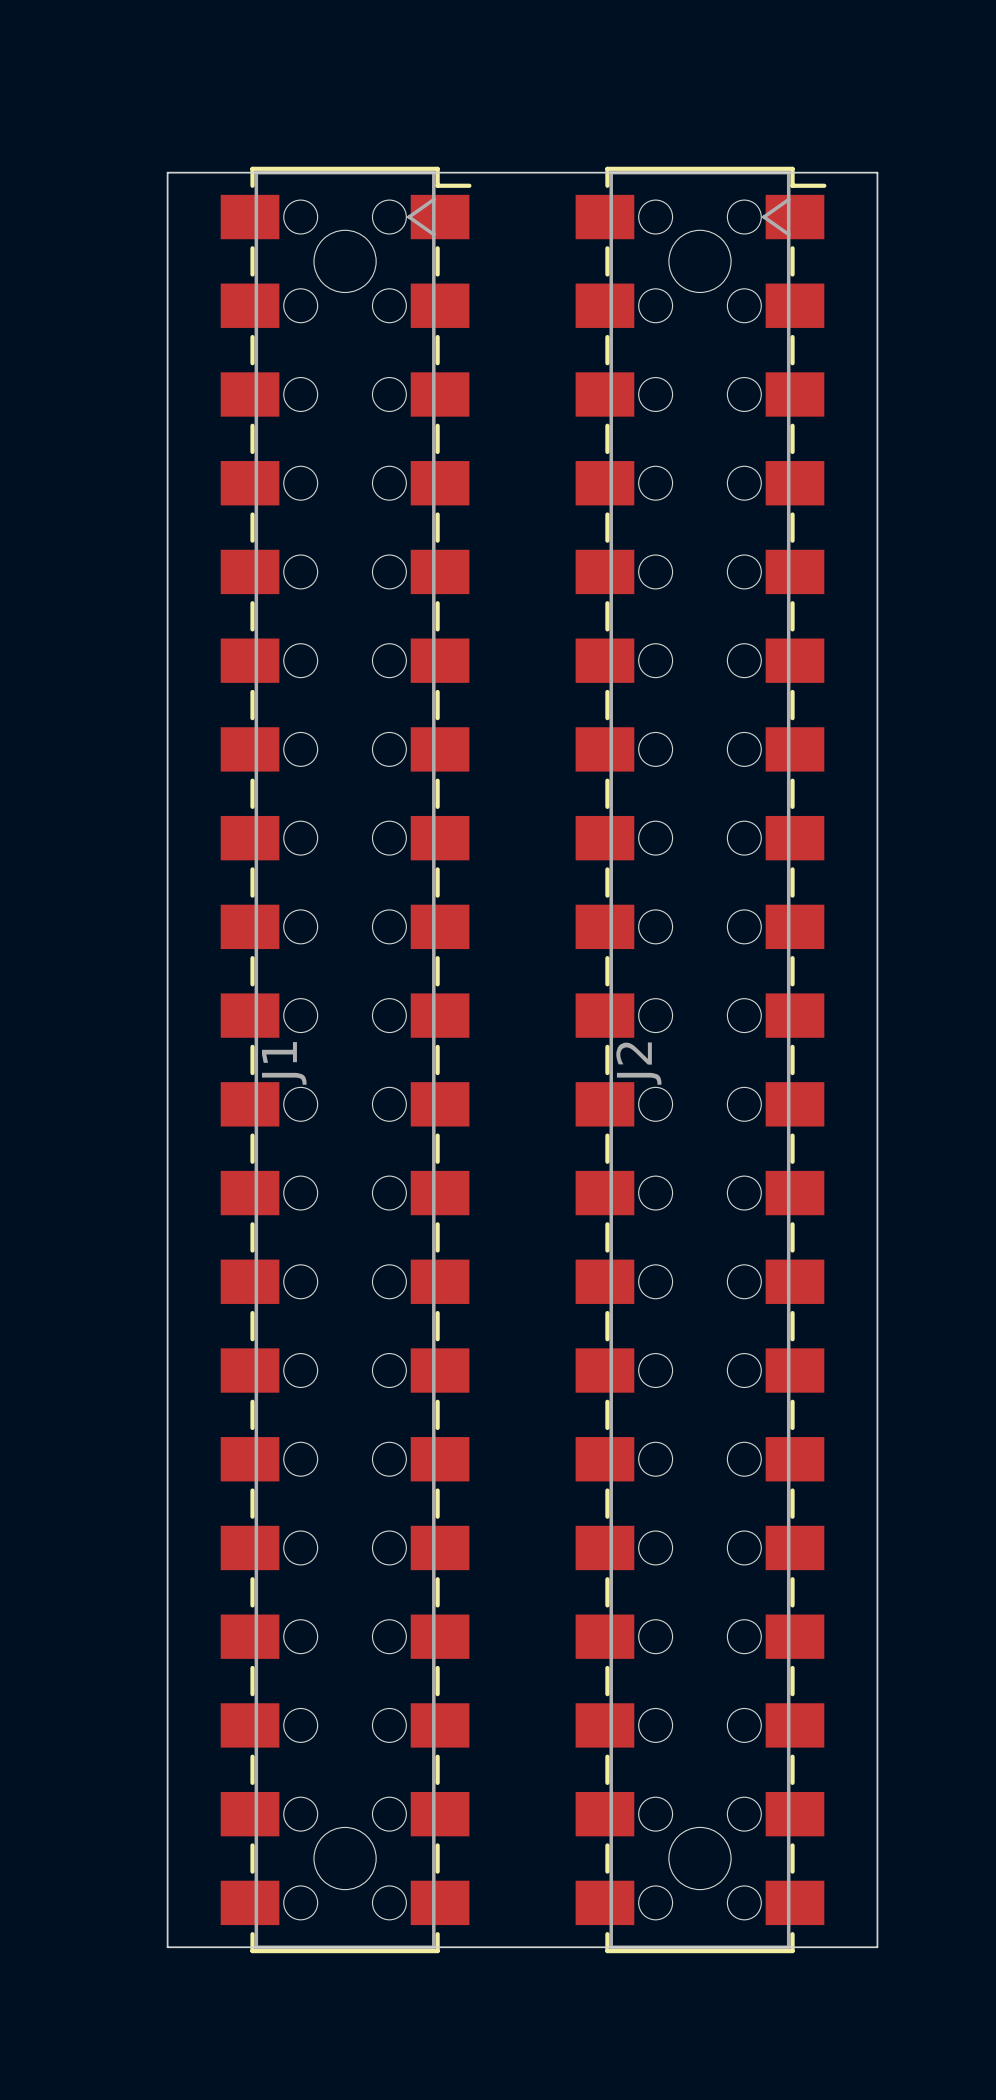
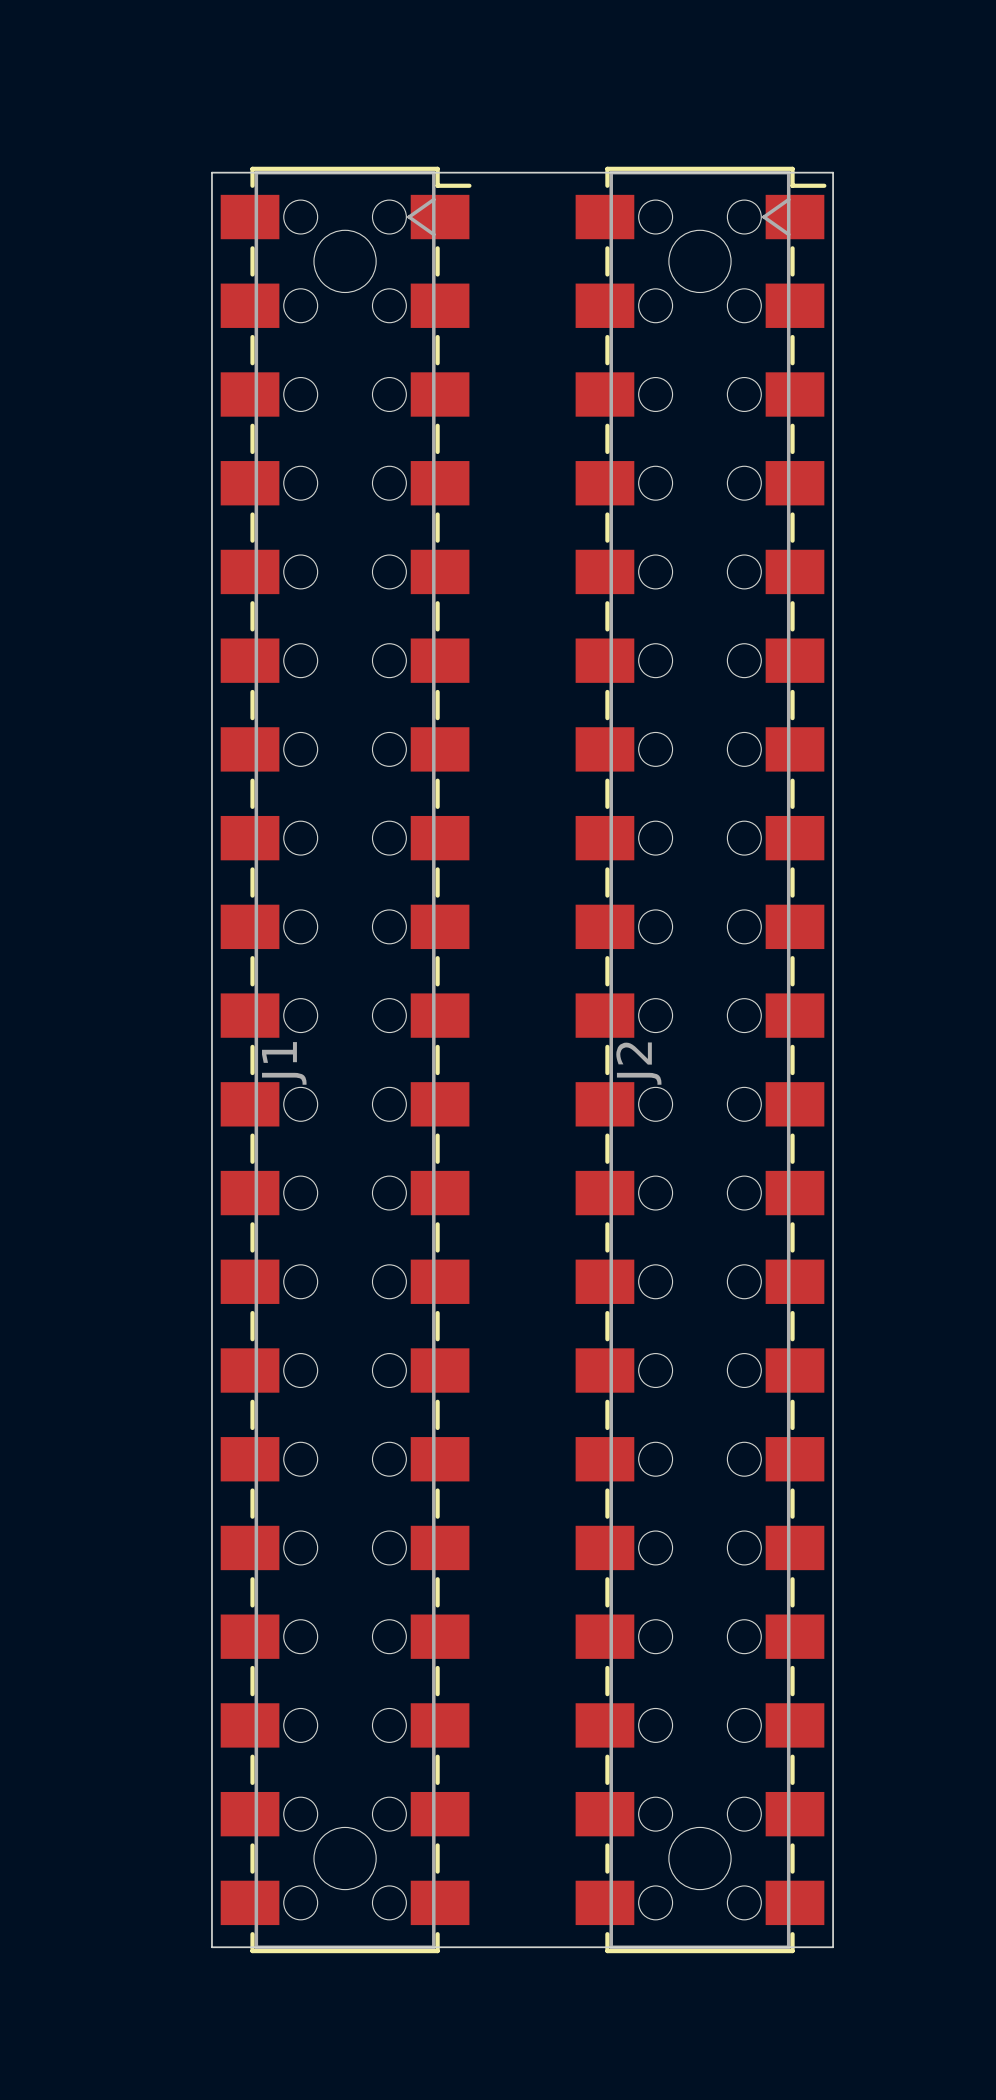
board edge: (211, 172) (167, 172) (167, 1947) (211, 1947) -> (211, 172) (211, 1947)
board edge: (833, 172) (877, 172) (877, 1947) (833, 1947) -> (833, 172) (833, 1947)

